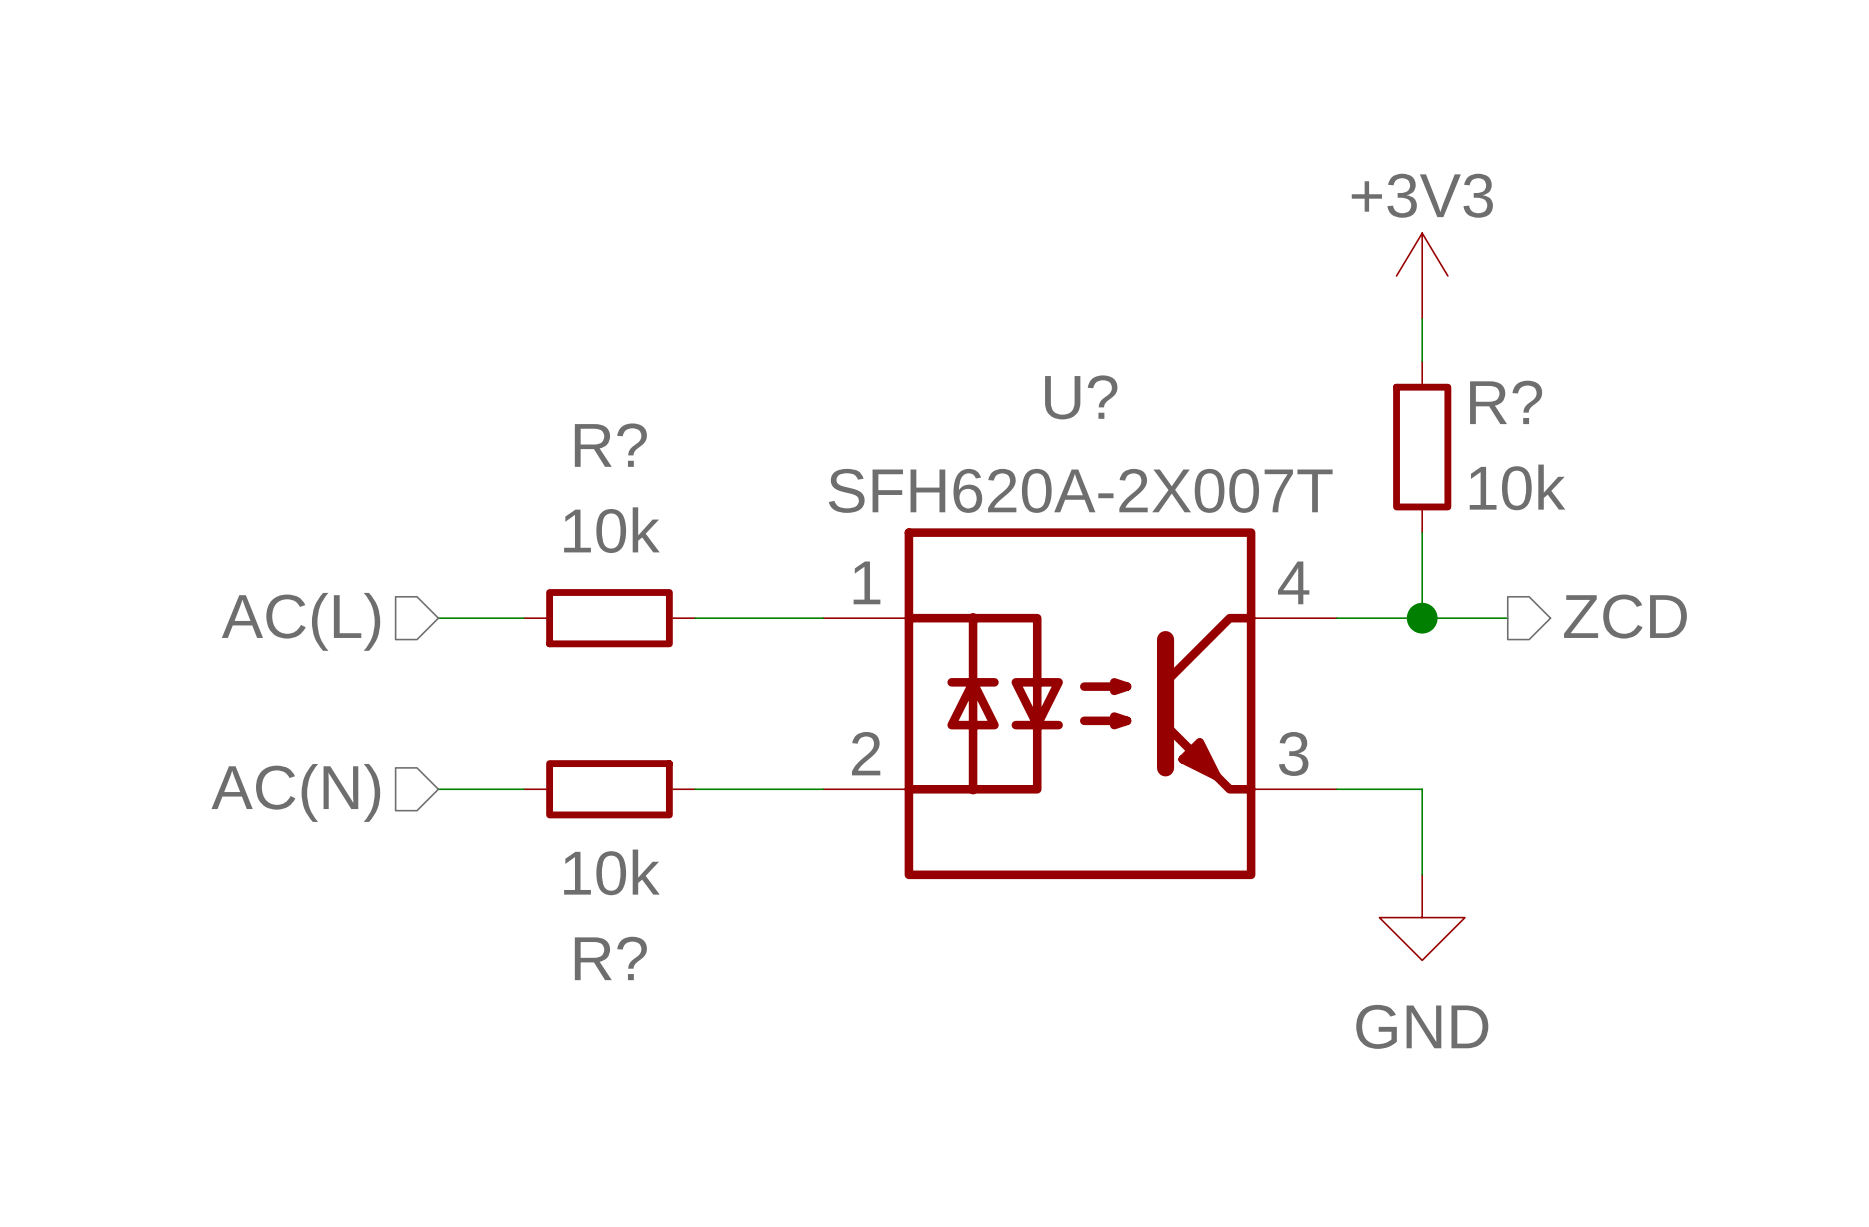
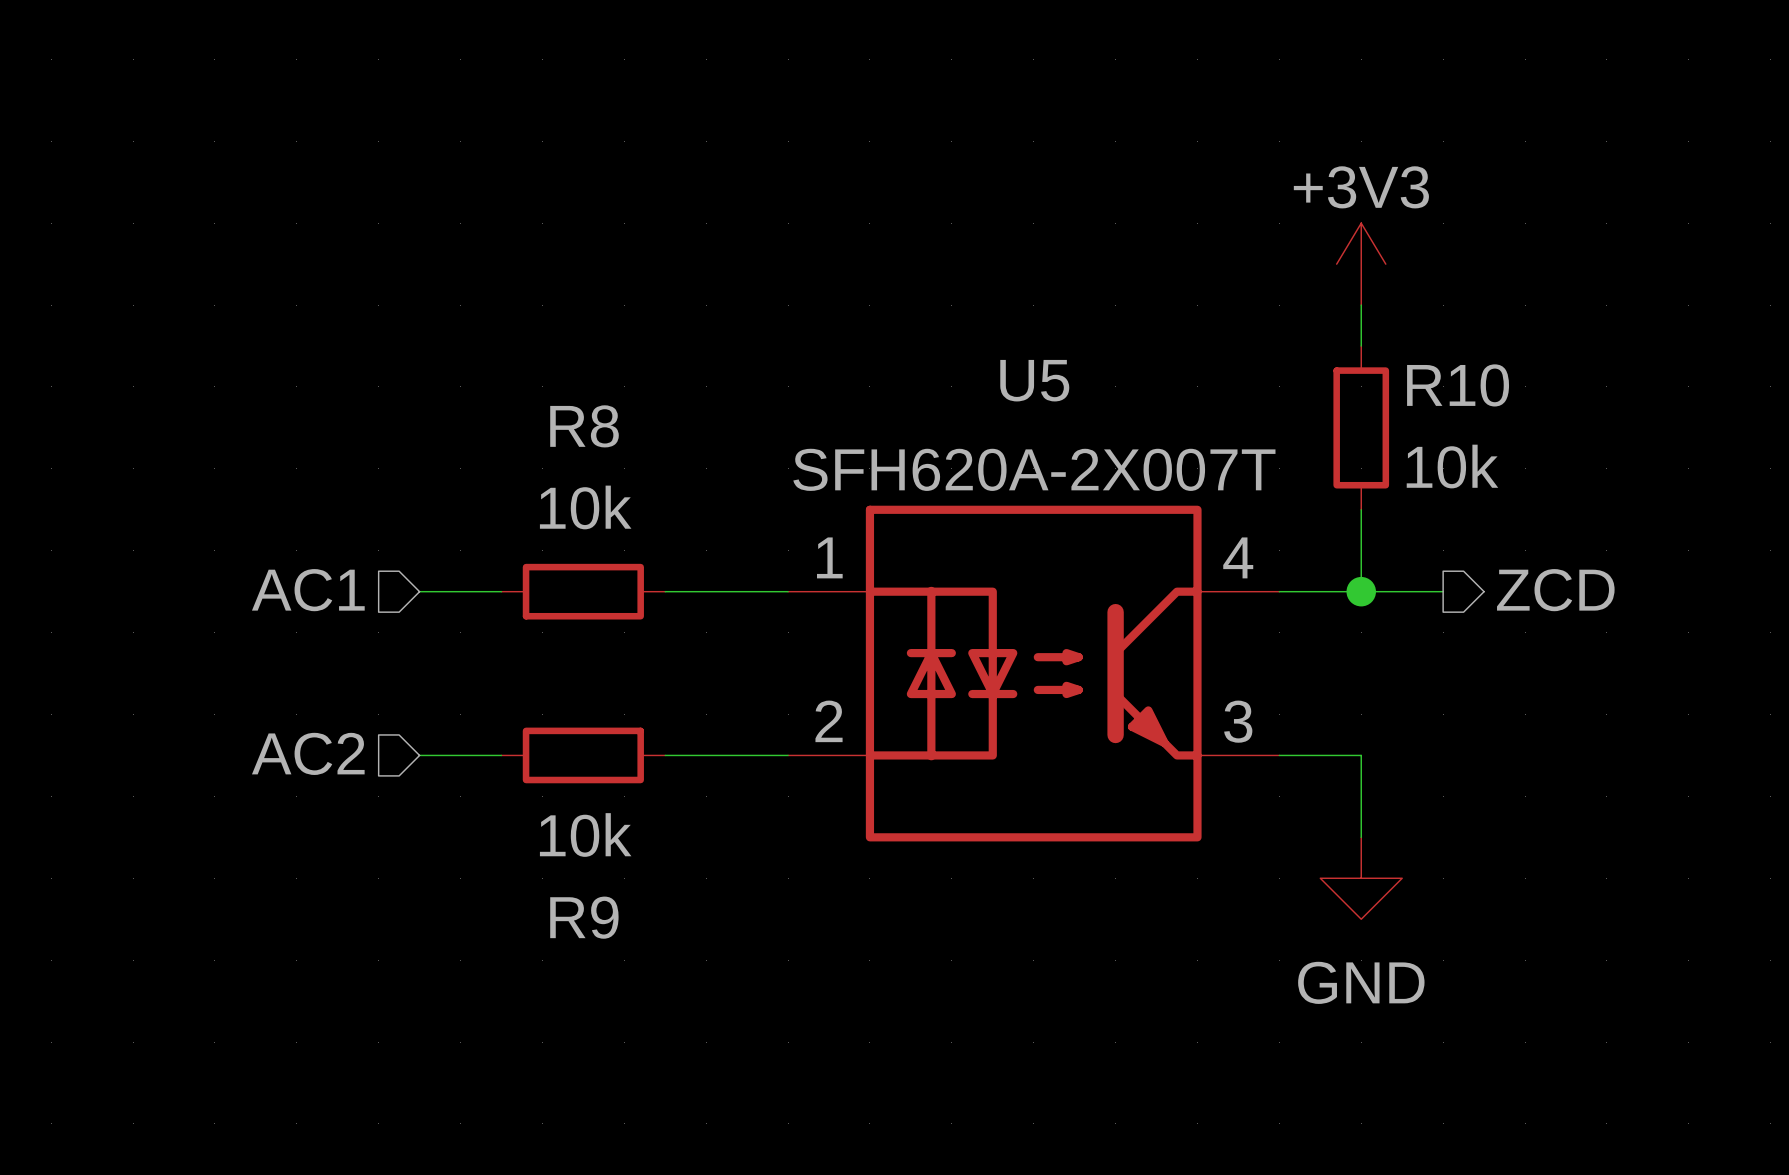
U? name: U? (1081, 397) -> U5 (1034, 380)
R? name: R? (1506, 402) -> R10 (1458, 385)
R? name: R? (610, 445) -> R8 (584, 426)
hierarchical label: AC(L) (301, 621) -> AC1 (308, 590)
hierarchical label: AC(N) (295, 792) -> AC2 (308, 753)
R? name: R? (610, 958) -> R9 (584, 917)

